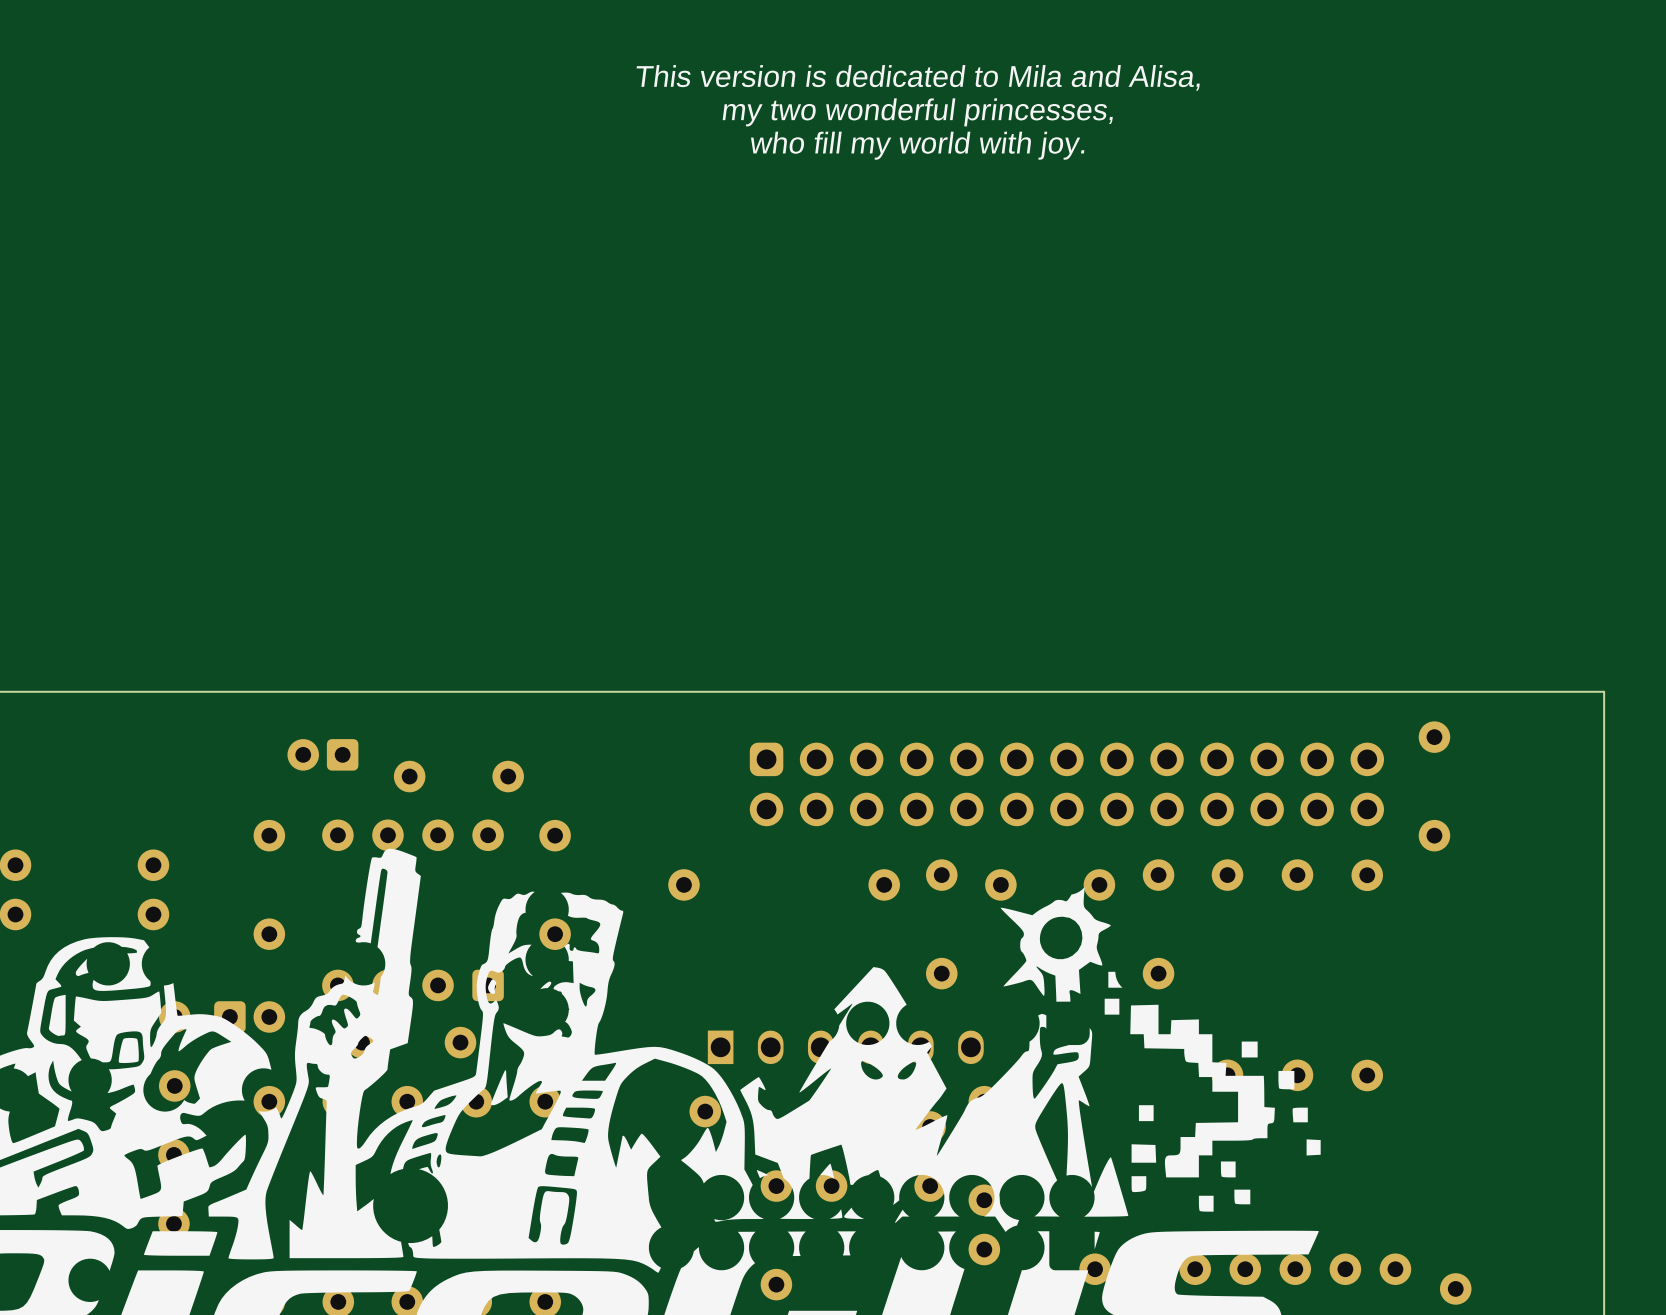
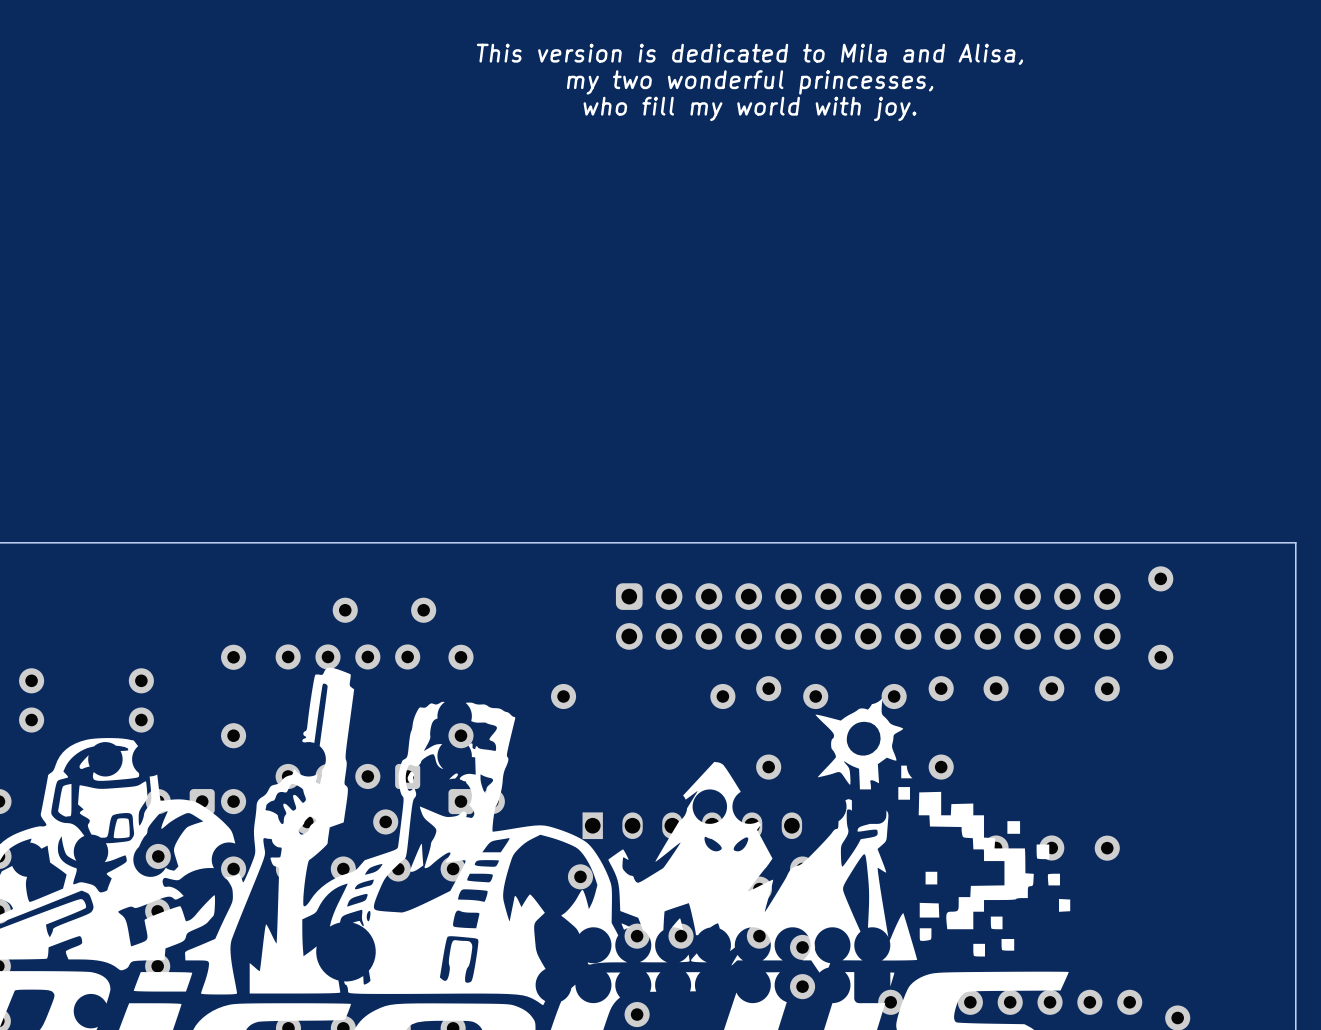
part rotation: 0° (322, 754) -> 180° (476, 801)
part position: (322, 754) -> (476, 801)

